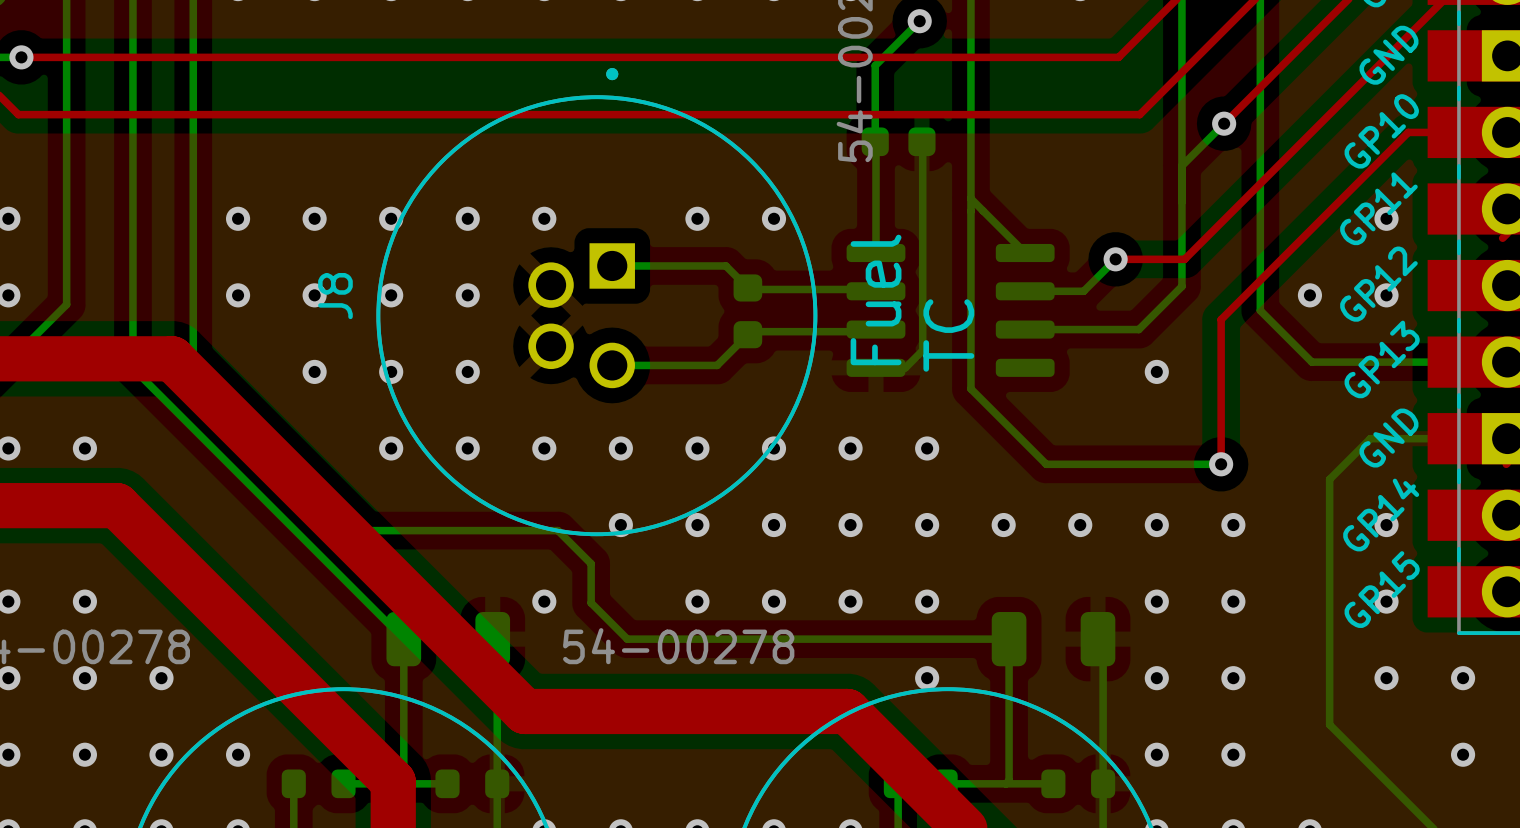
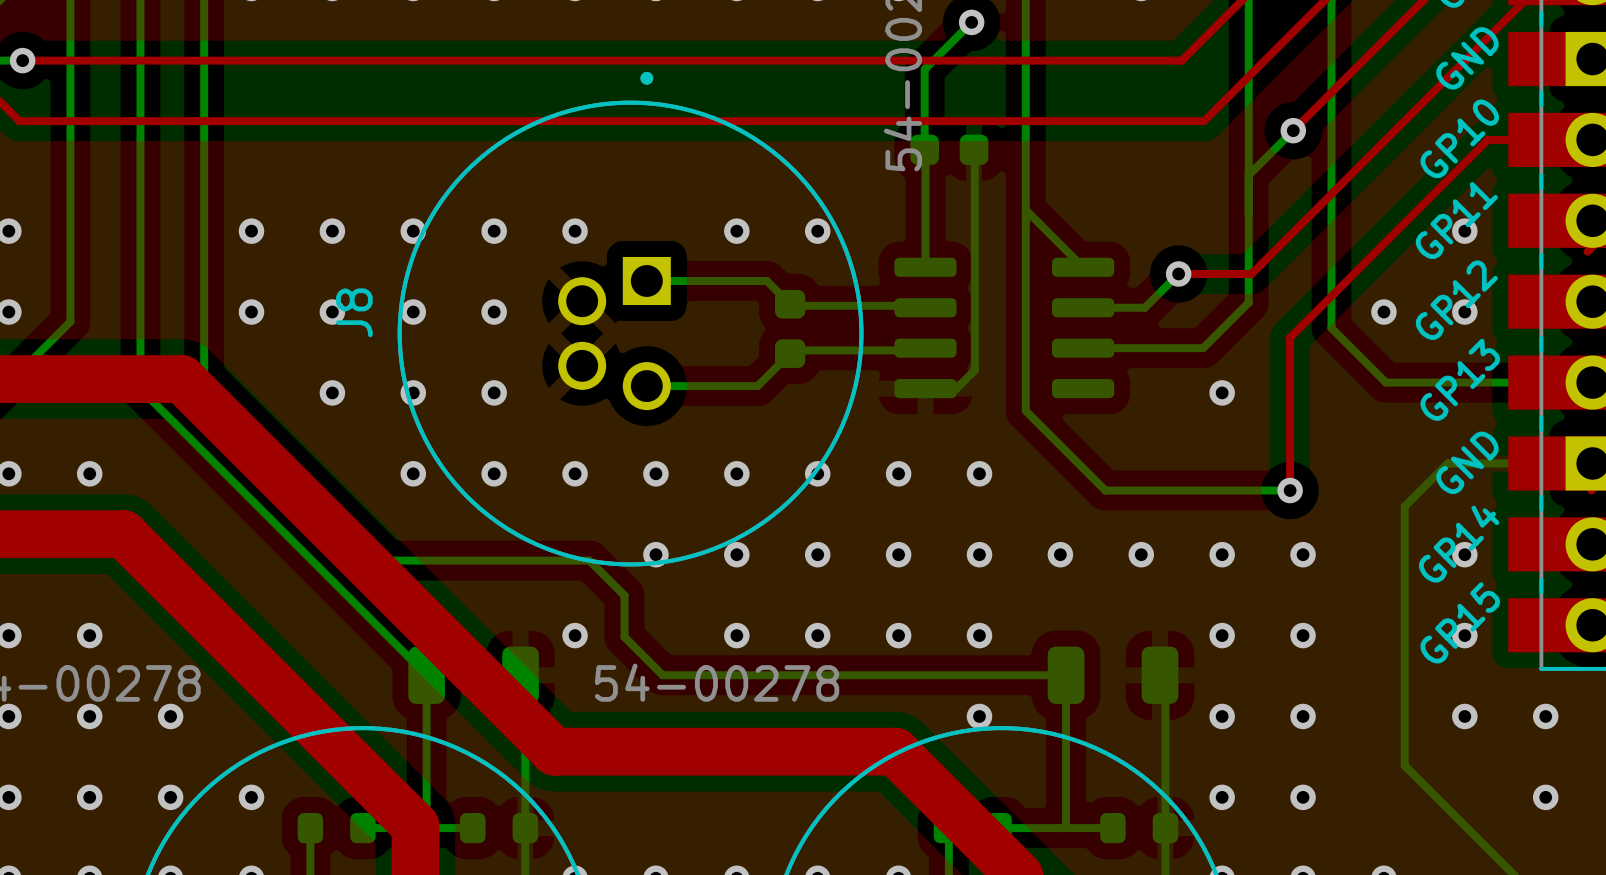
text: Fuel (876, 299) -> none
text: TC (948, 335) -> none

